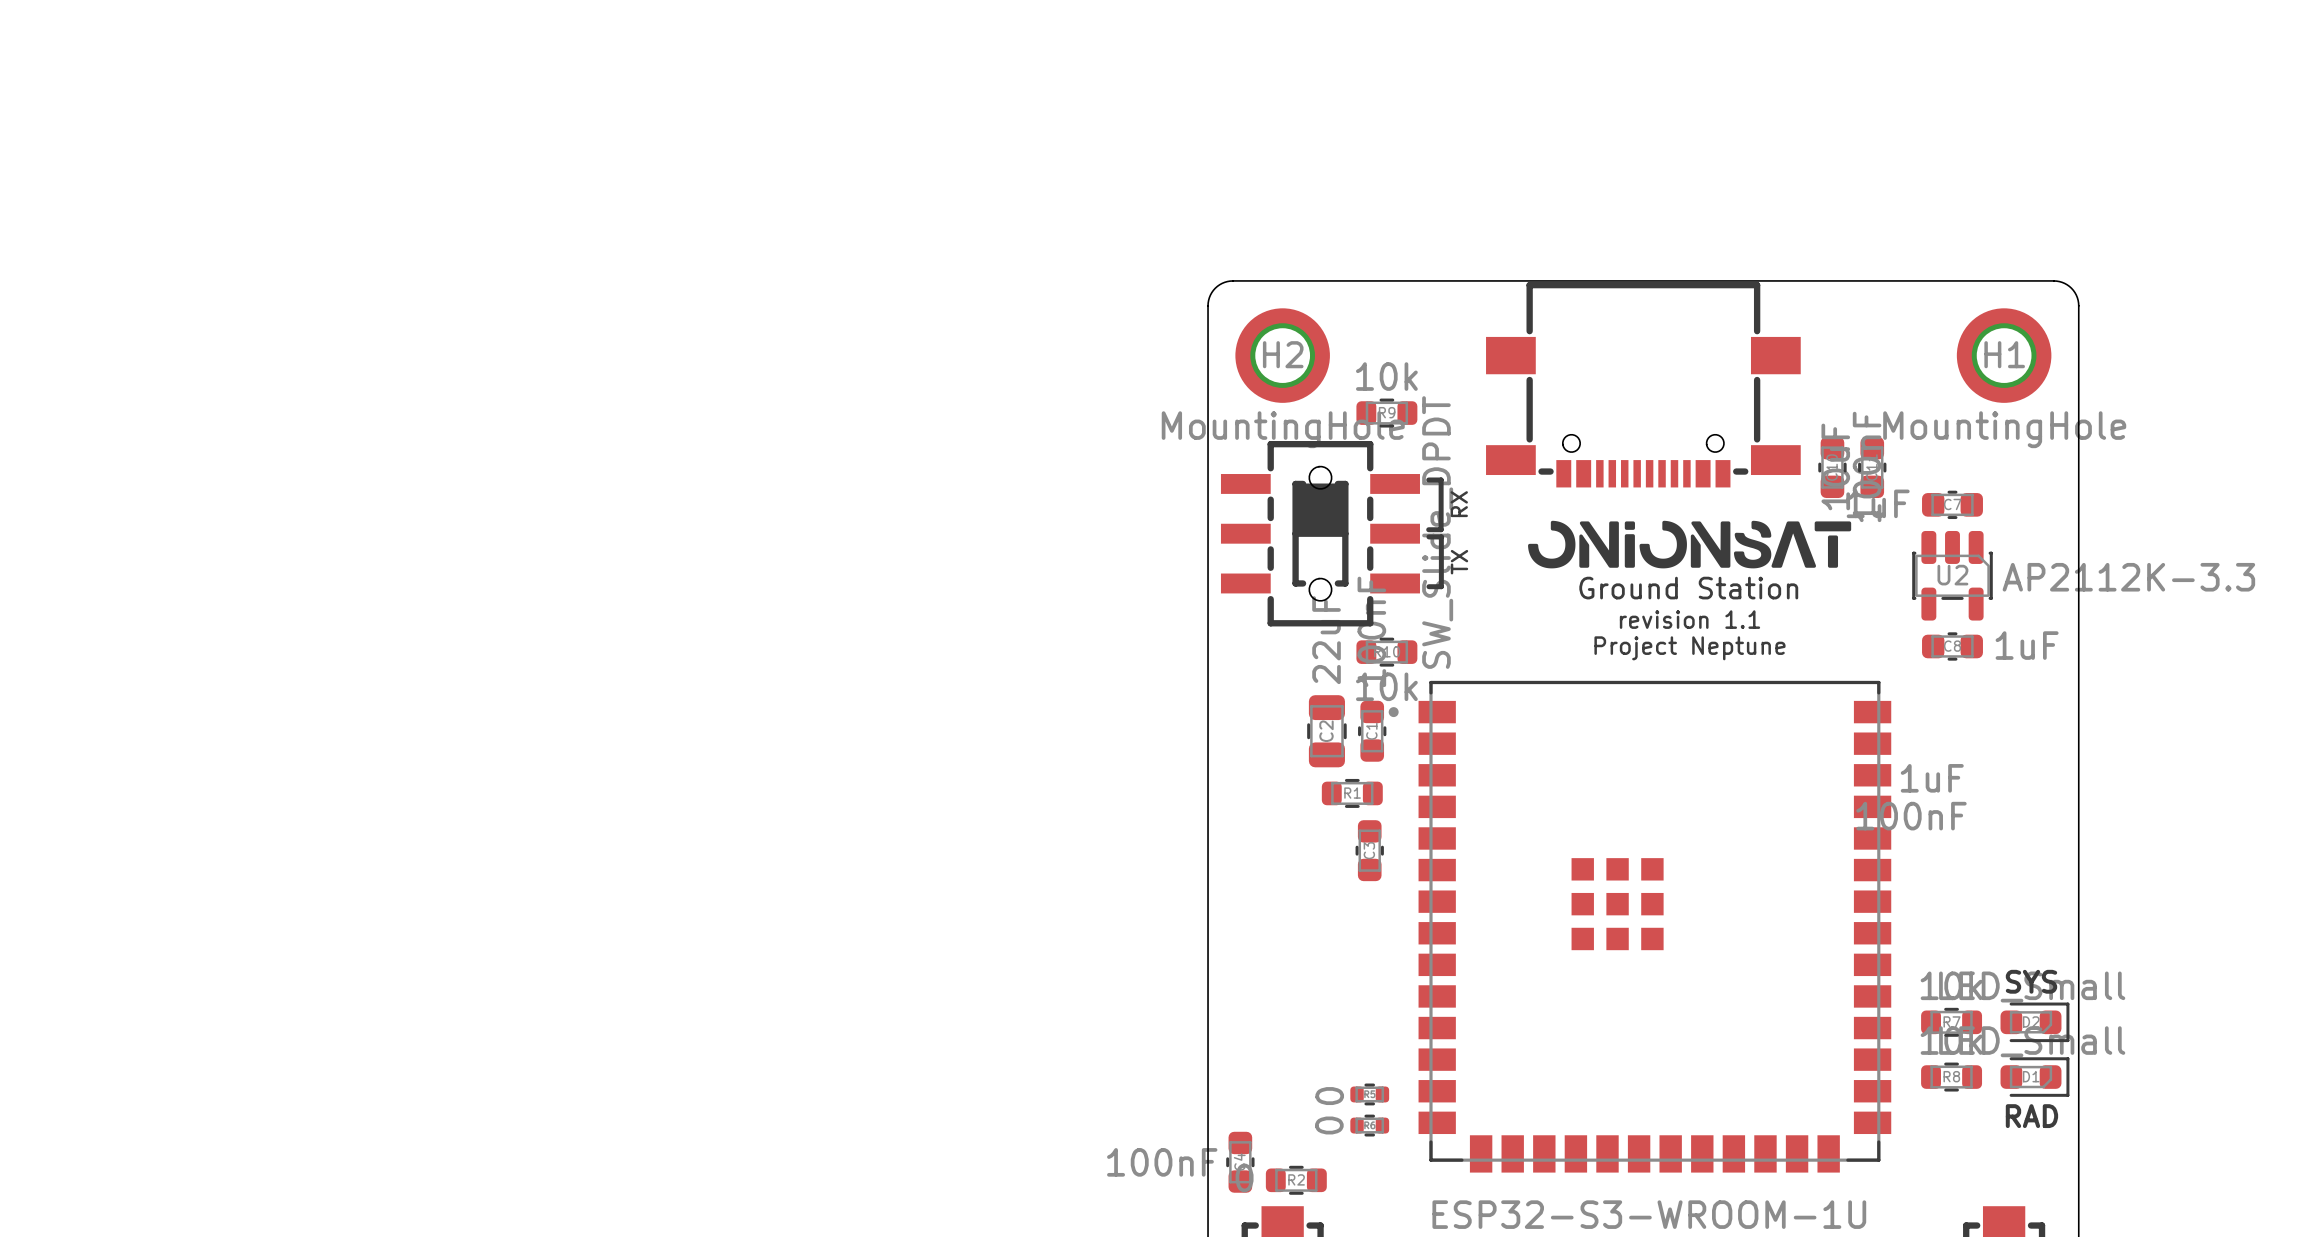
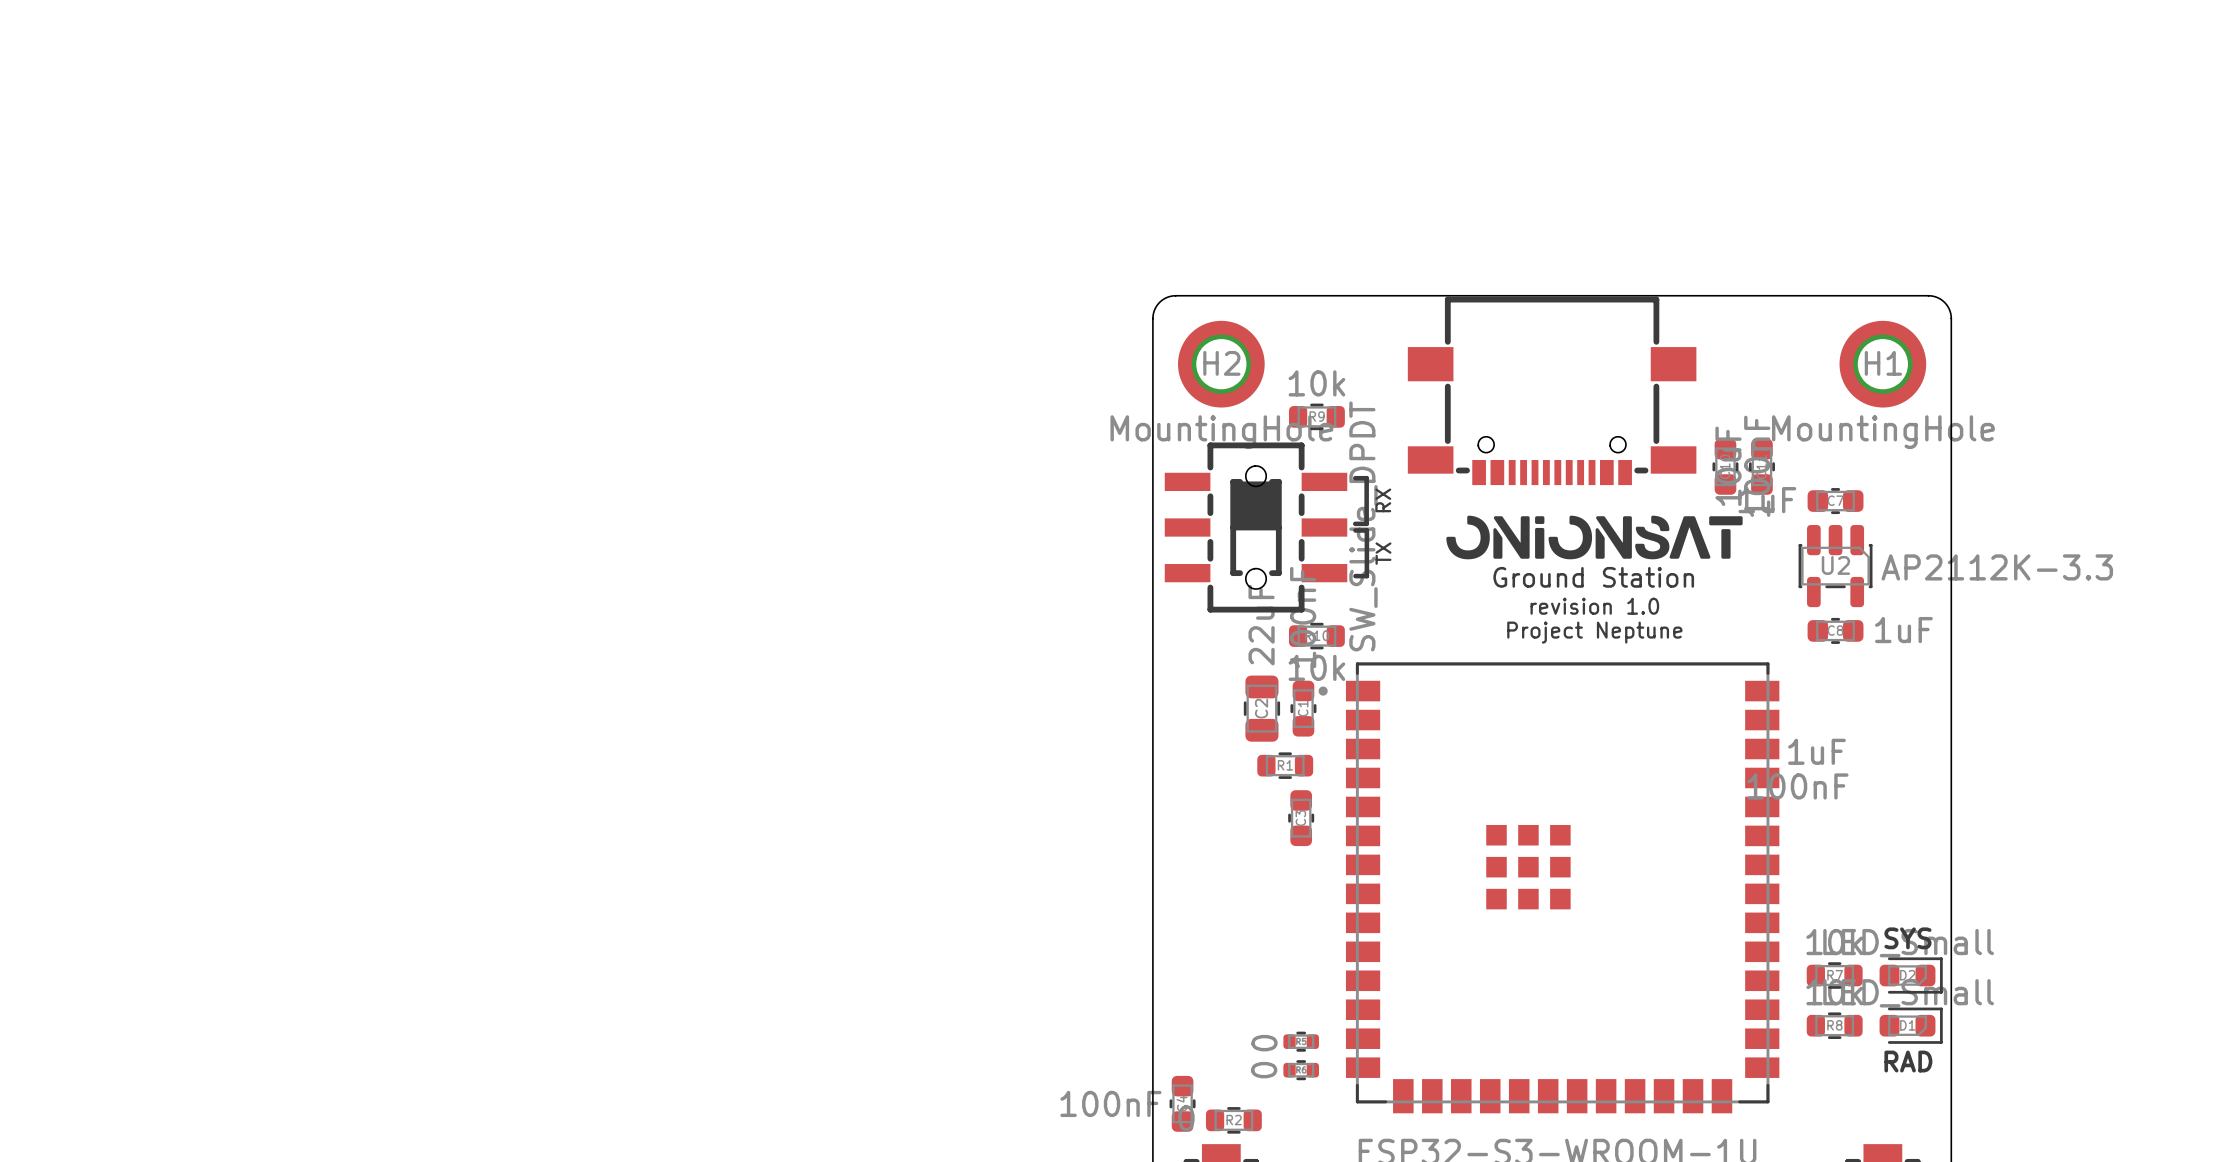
text: revision 1.1 (1689, 619) -> revision 1.0 (1594, 606)

